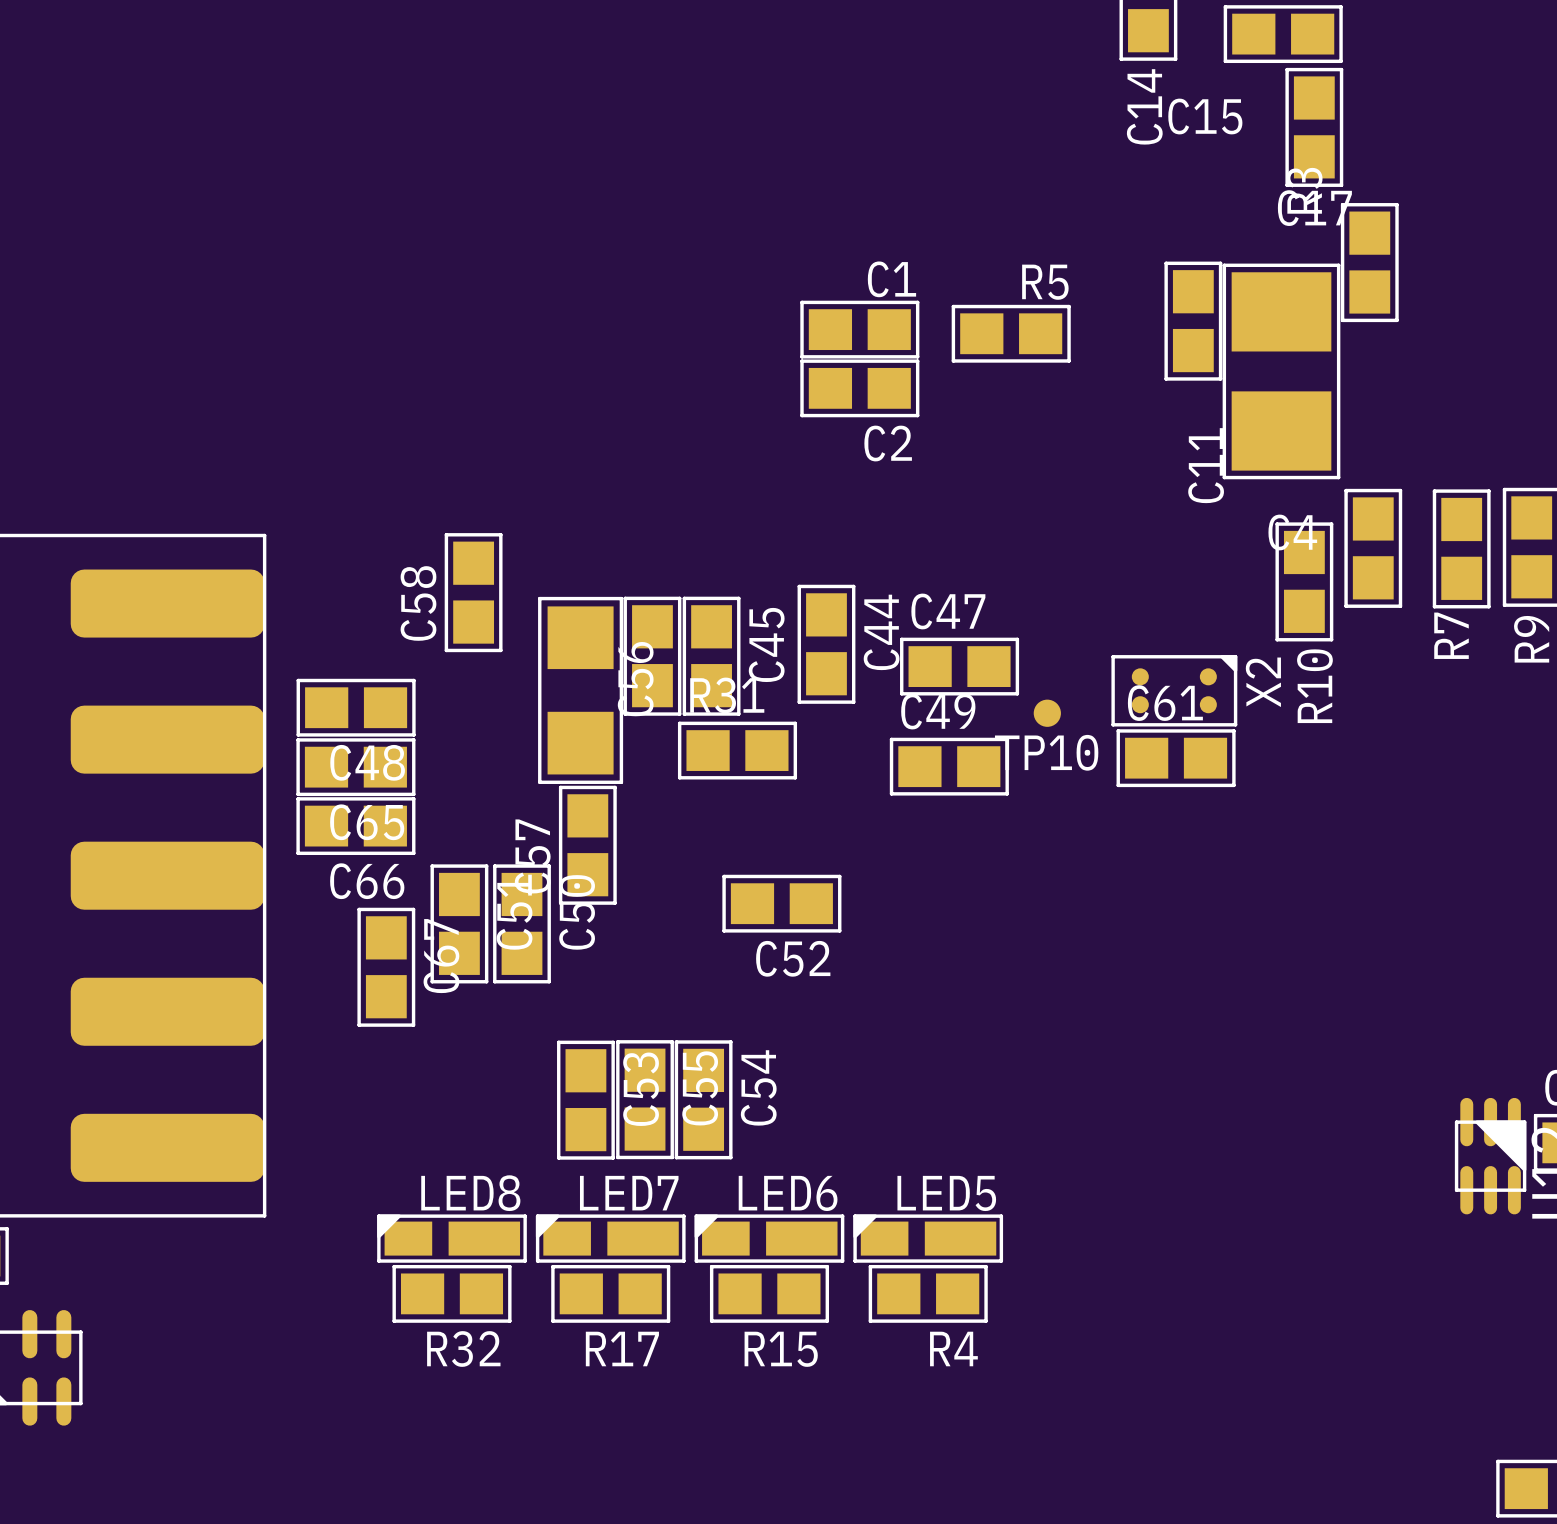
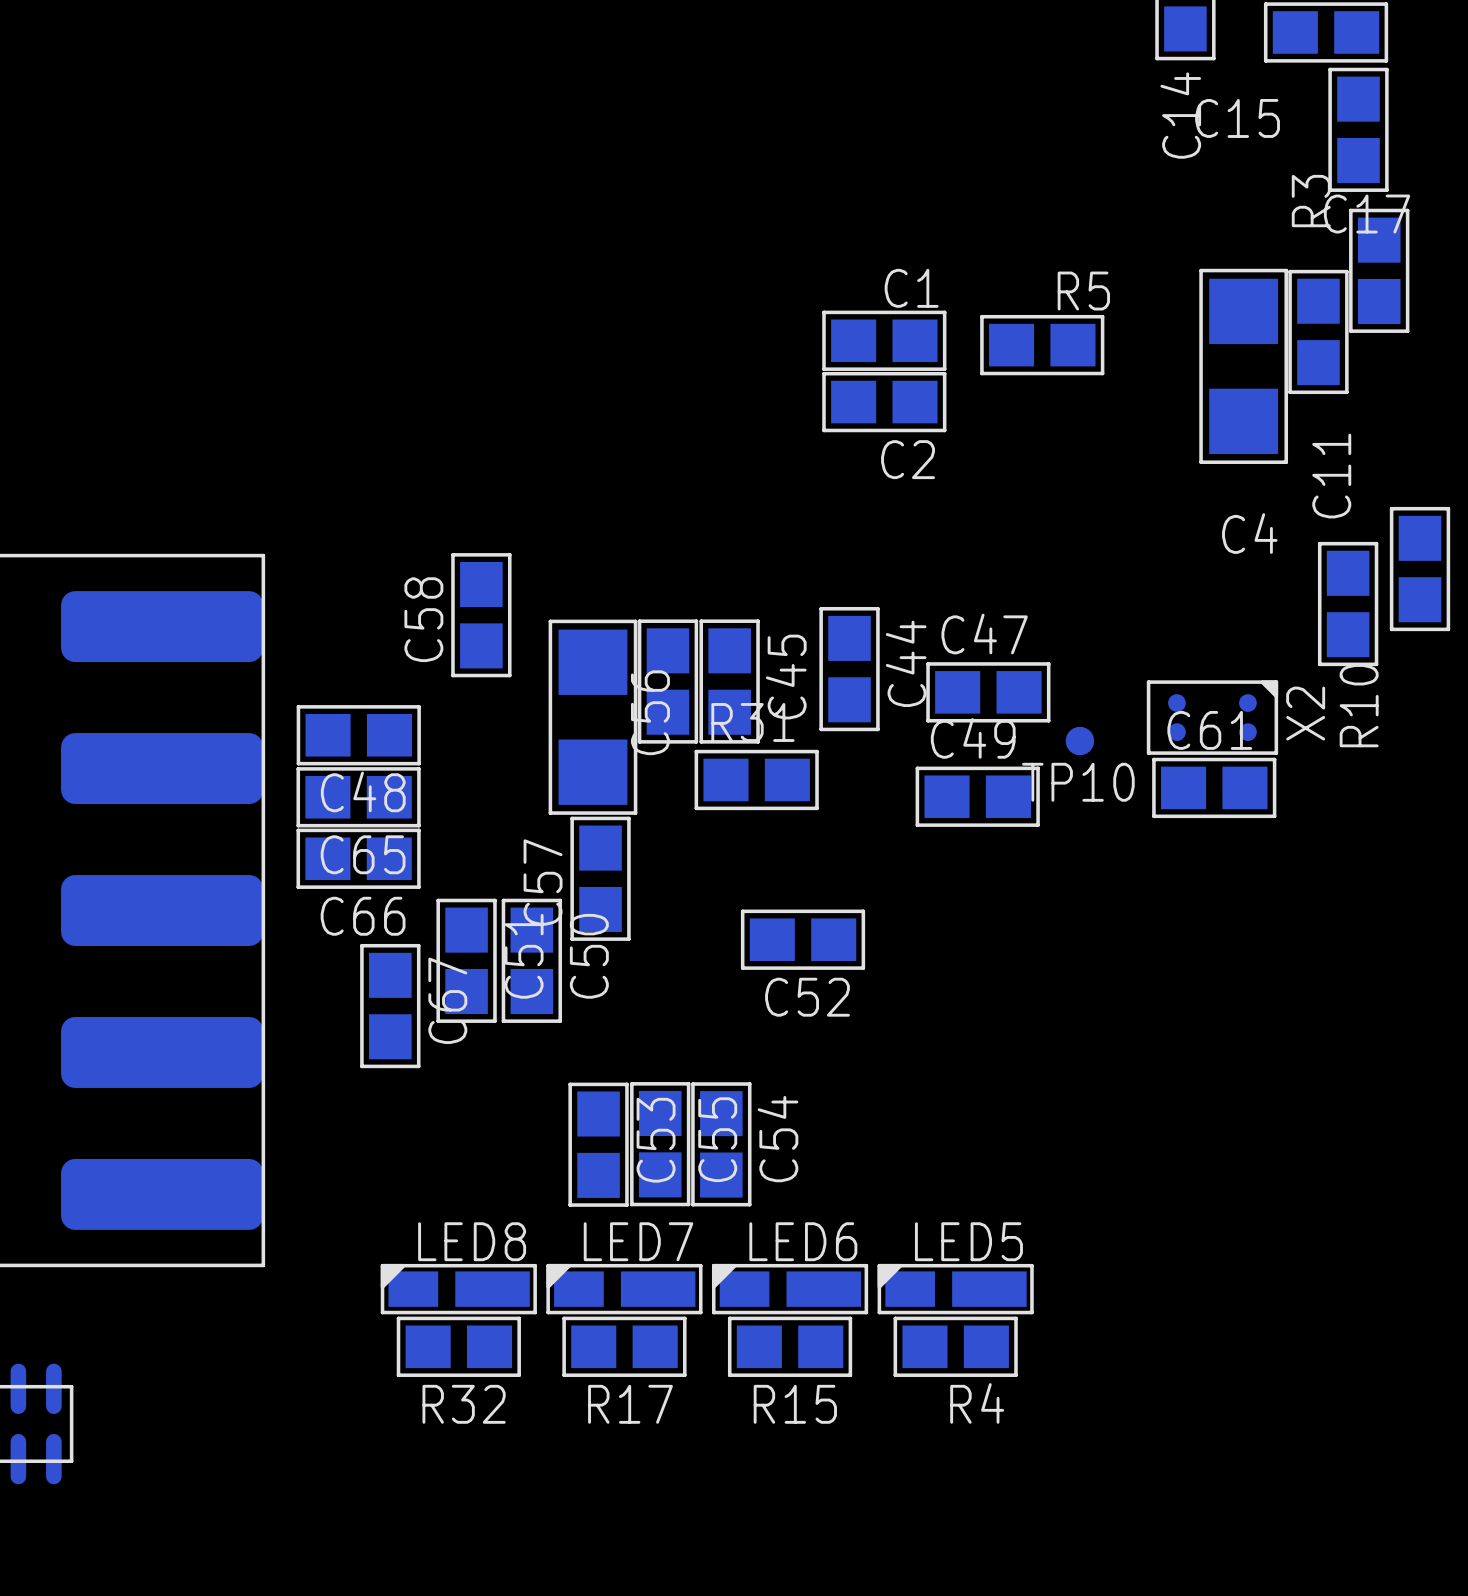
R3 position: (1369, 262) -> (1379, 270)
C4 footprint: [1222, 263, 1341, 480] -> [1199, 268, 1289, 464]
C11 position: (1193, 321) -> (1318, 331)

